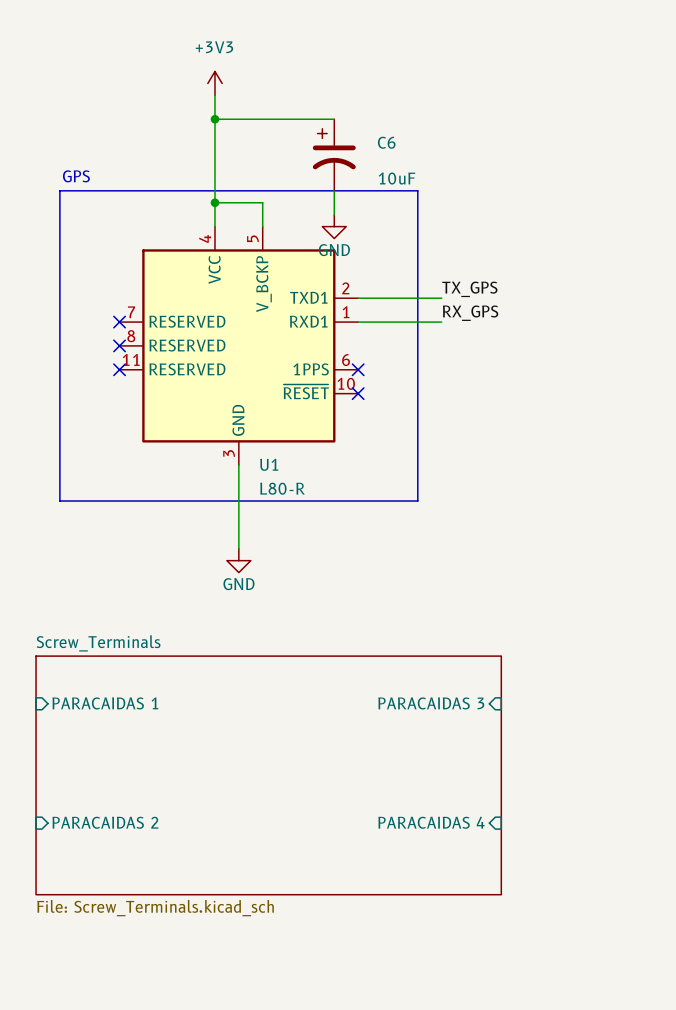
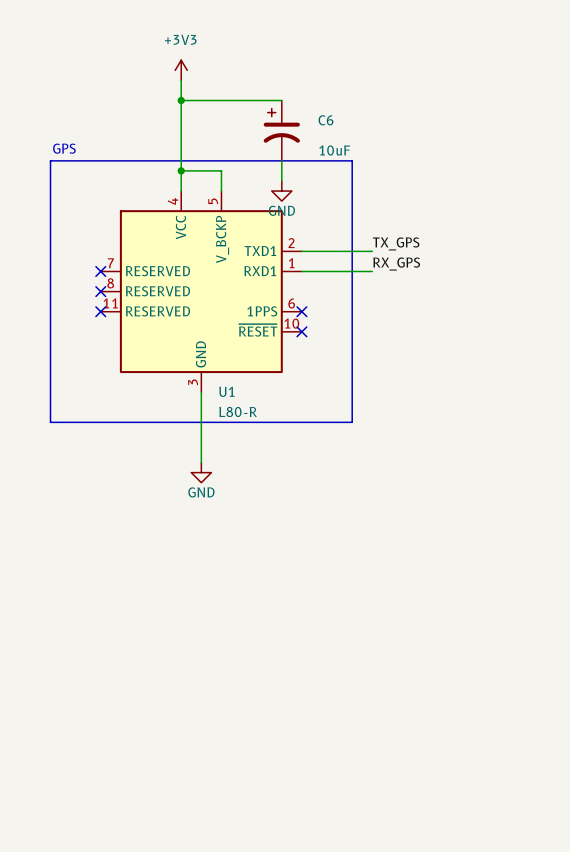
sheet pin: PARACAIDAS 1 (105, 703) -> none
sheet pin: PARACAIDAS 3 (431, 703) -> none
sheet Screw_Terminals: File: Screw_Terminals.kicad_sch (268, 775) -> none
sheet pin: PARACAIDAS 2 (105, 822) -> none
sheet pin: PARACAIDAS 4 (431, 822) -> none

